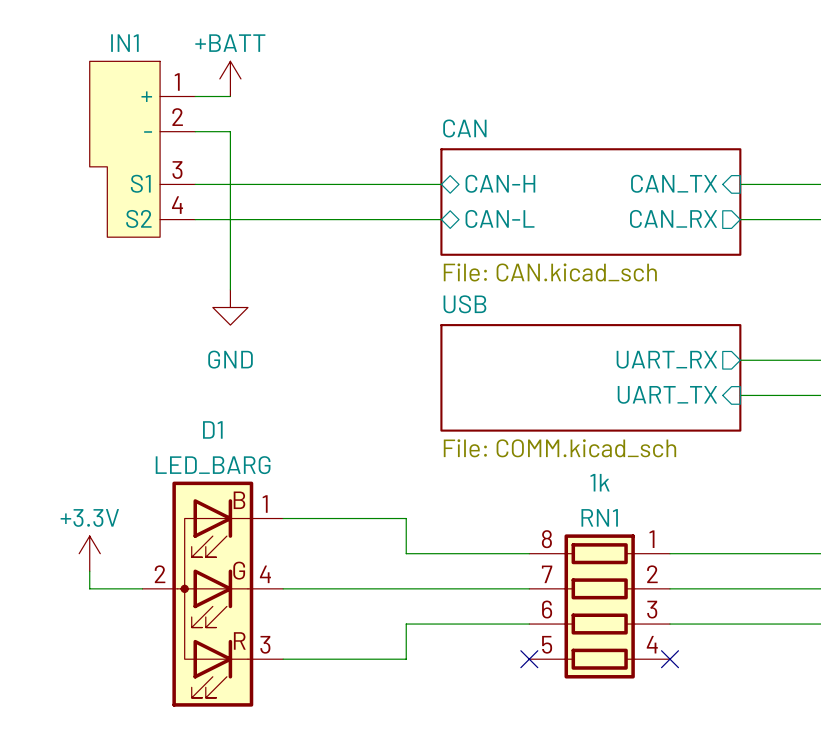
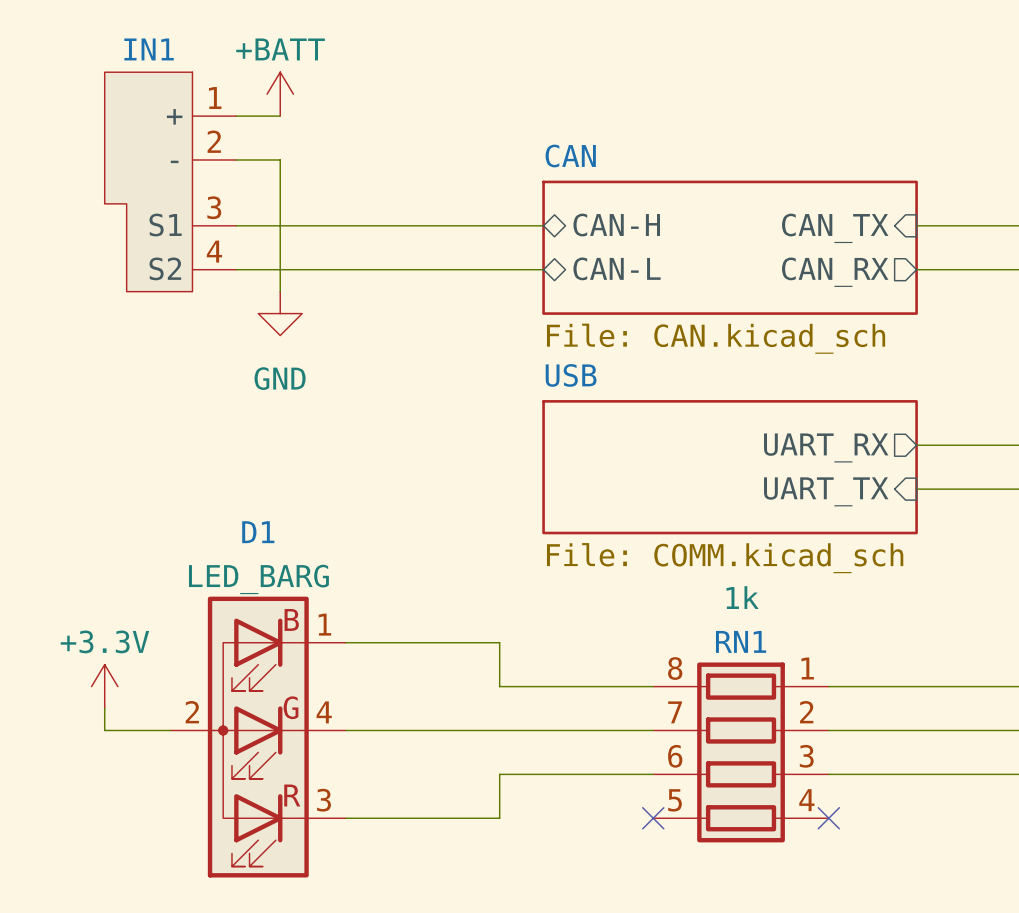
wire: (230, 237) (230, 289) -> none
power symbol position: GND (230, 307) -> GND (280, 313)

